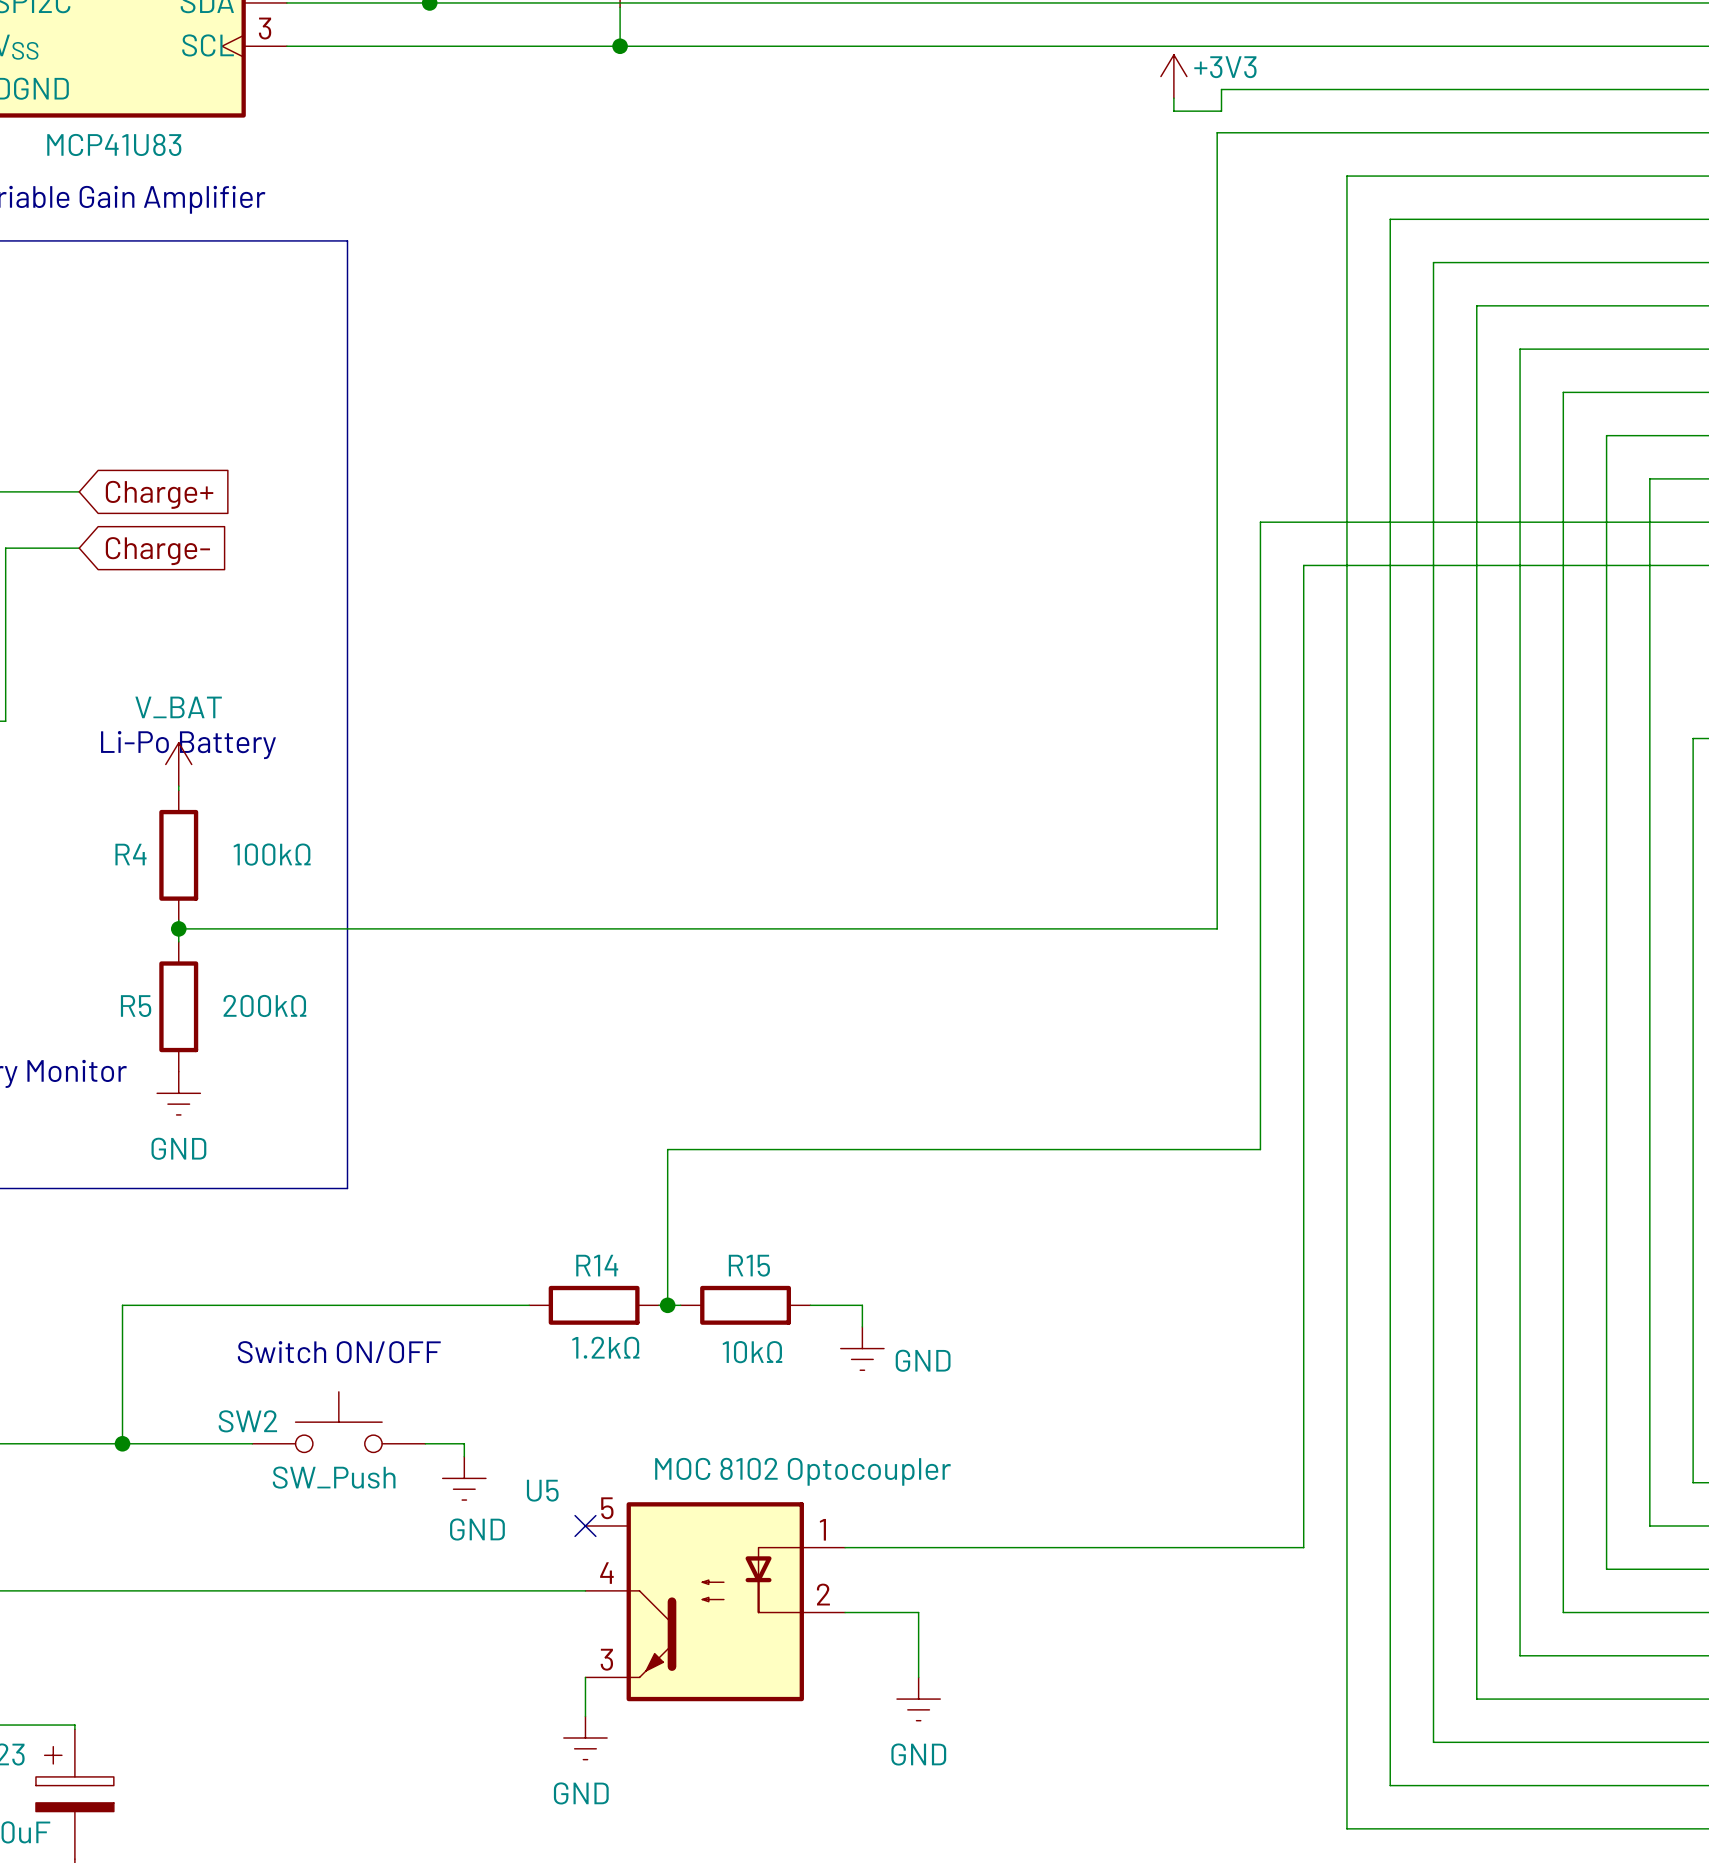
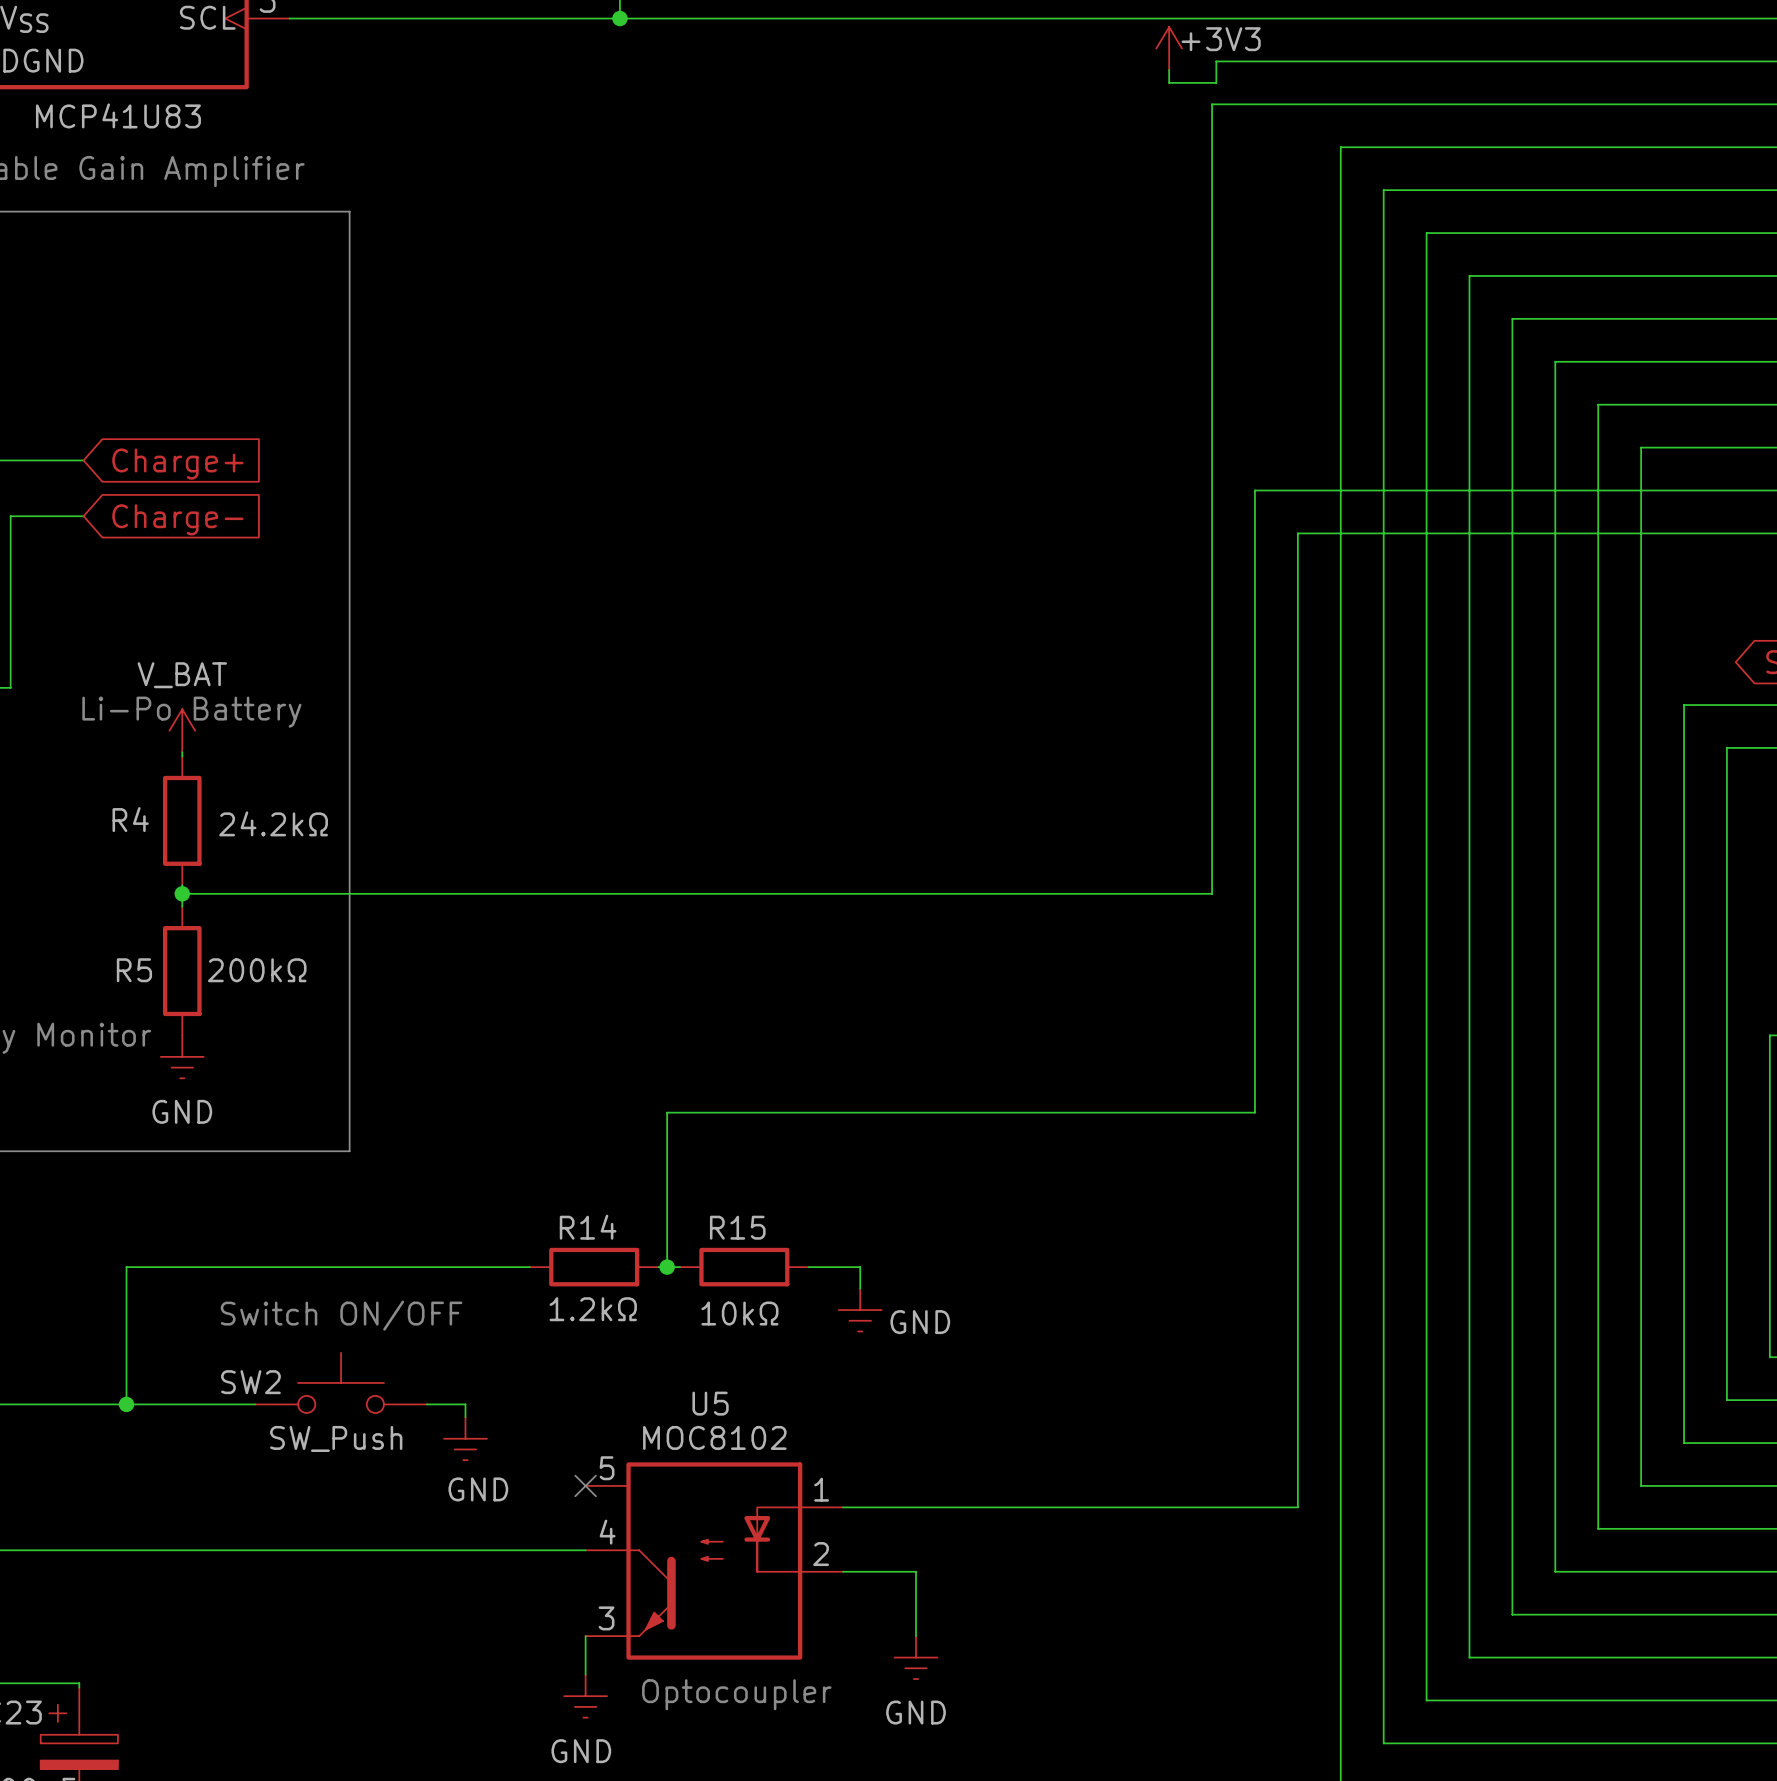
R4 value: 100kΩ (272, 854) -> 24.2kΩ (273, 823)
U5 value: MOC 8102 Optocoupler (803, 1471) -> MOC8102 (714, 1437)
U5 name position: U5 (542, 1490) -> U5 (710, 1403)
text: none -> Optocoupler (736, 1694)

